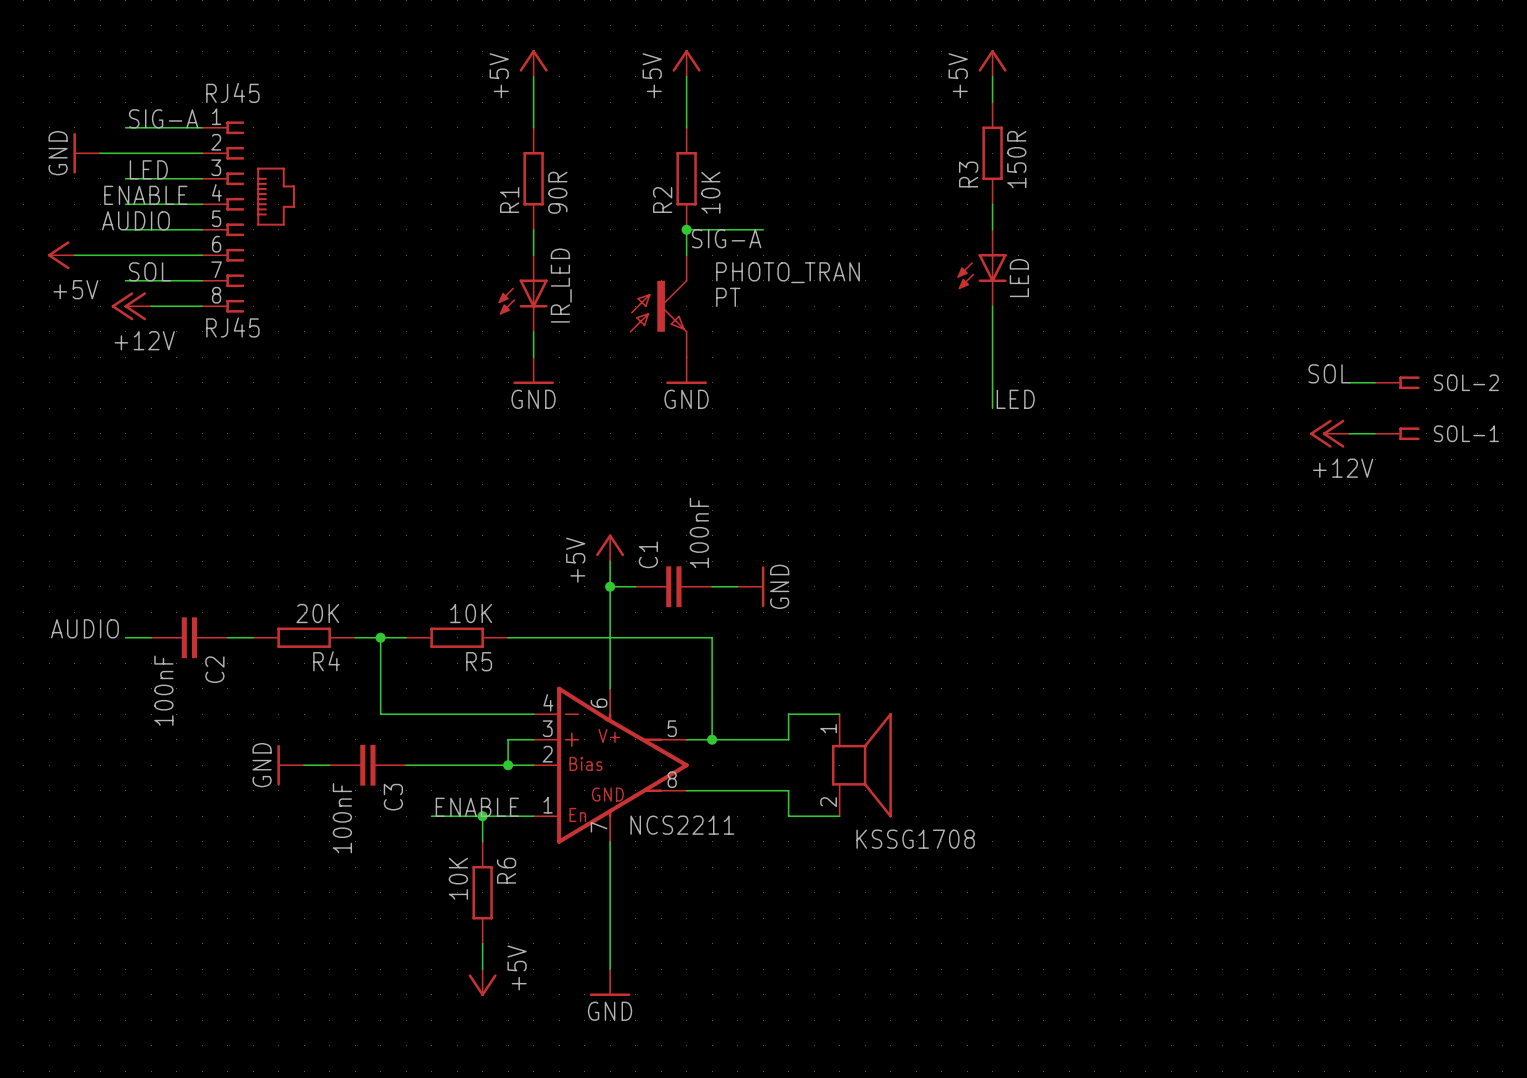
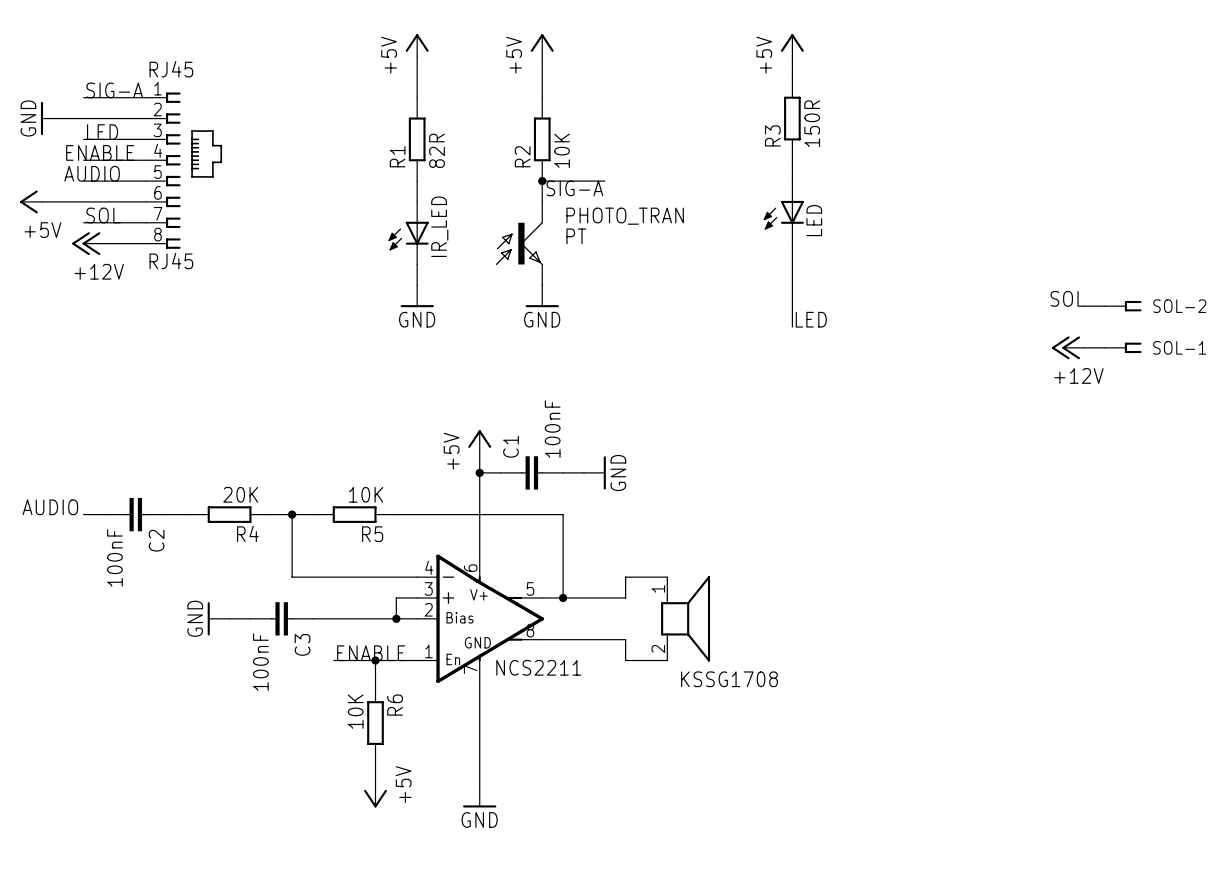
R1 value: 90R (557, 192) -> 82R (436, 150)

